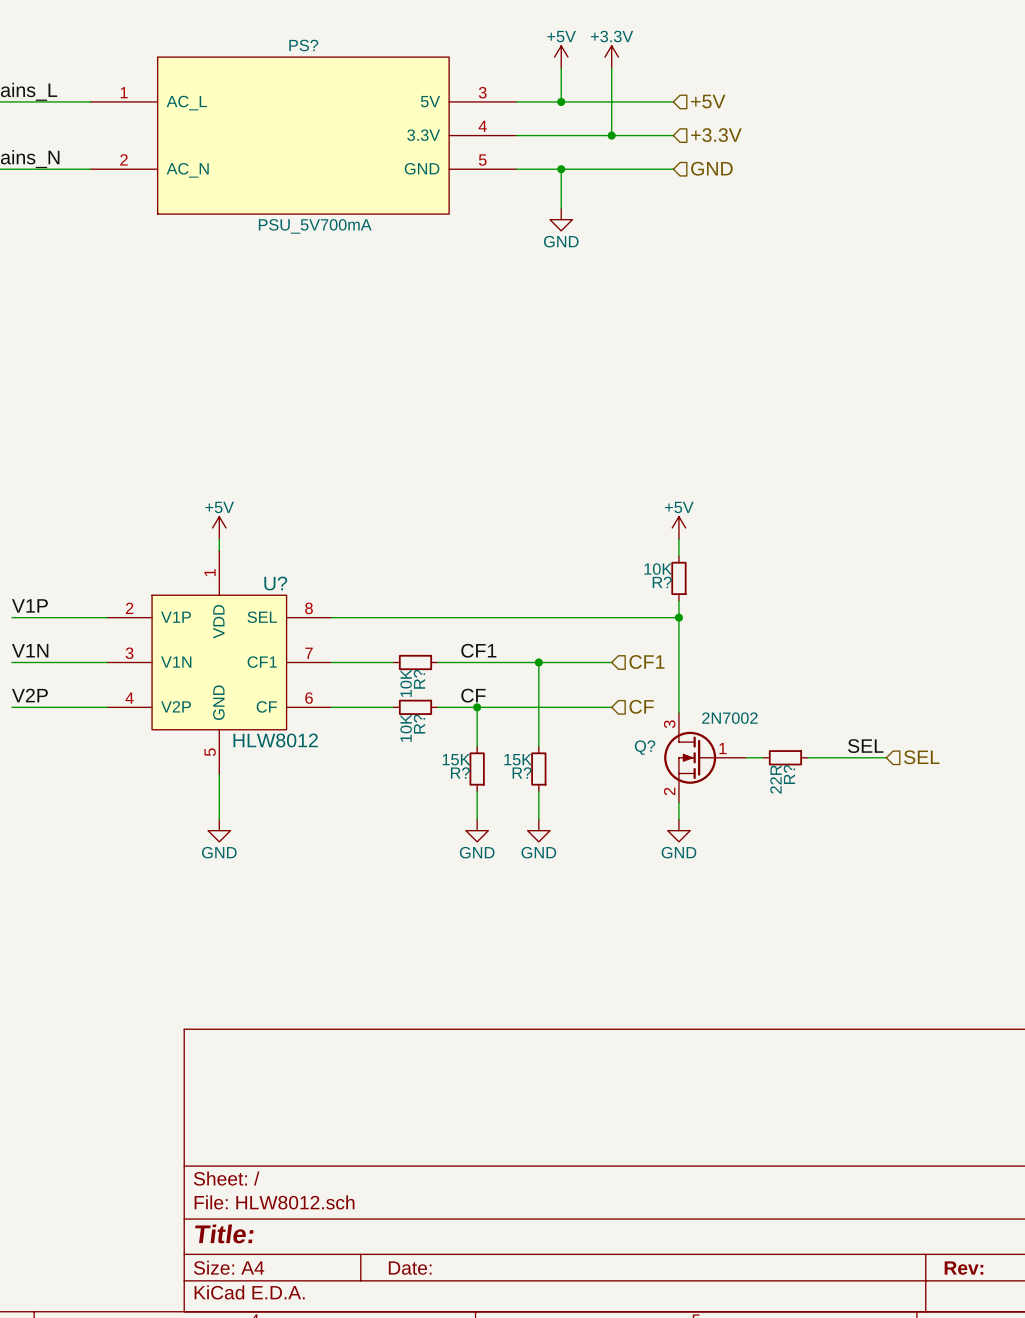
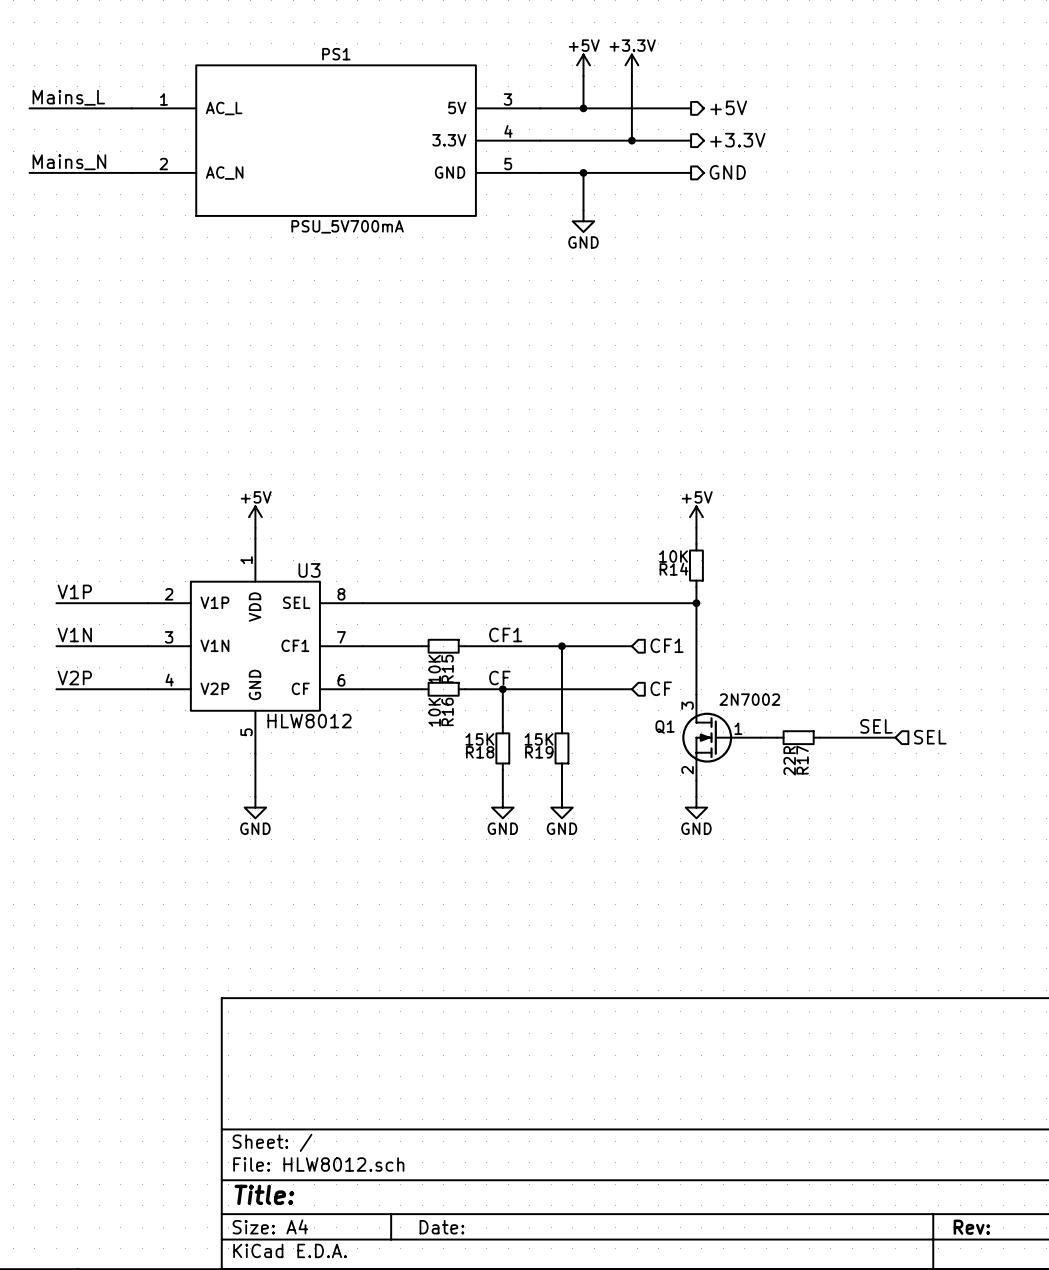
PS? name: PS? (303, 45) -> PS1 (336, 54)
hierarchical label shape: input (708, 101) -> output (728, 107)
hierarchical label shape: input (716, 135) -> output (737, 140)
hierarchical label shape: input (711, 168) -> output (727, 172)
R? name: R? (662, 582) -> R14 (674, 569)
U? name: U? (275, 583) -> U3 (309, 570)
R? name: R? (419, 679) -> R15 (447, 668)
R? name: R? (419, 724) -> R16 (447, 711)
Q? name: Q? (645, 747) -> Q1 (665, 727)
R? name: R? (460, 772) -> R18 (480, 752)
R? name: R? (522, 772) -> R19 (539, 752)
R? name: R? (789, 774) -> R17 (802, 760)

